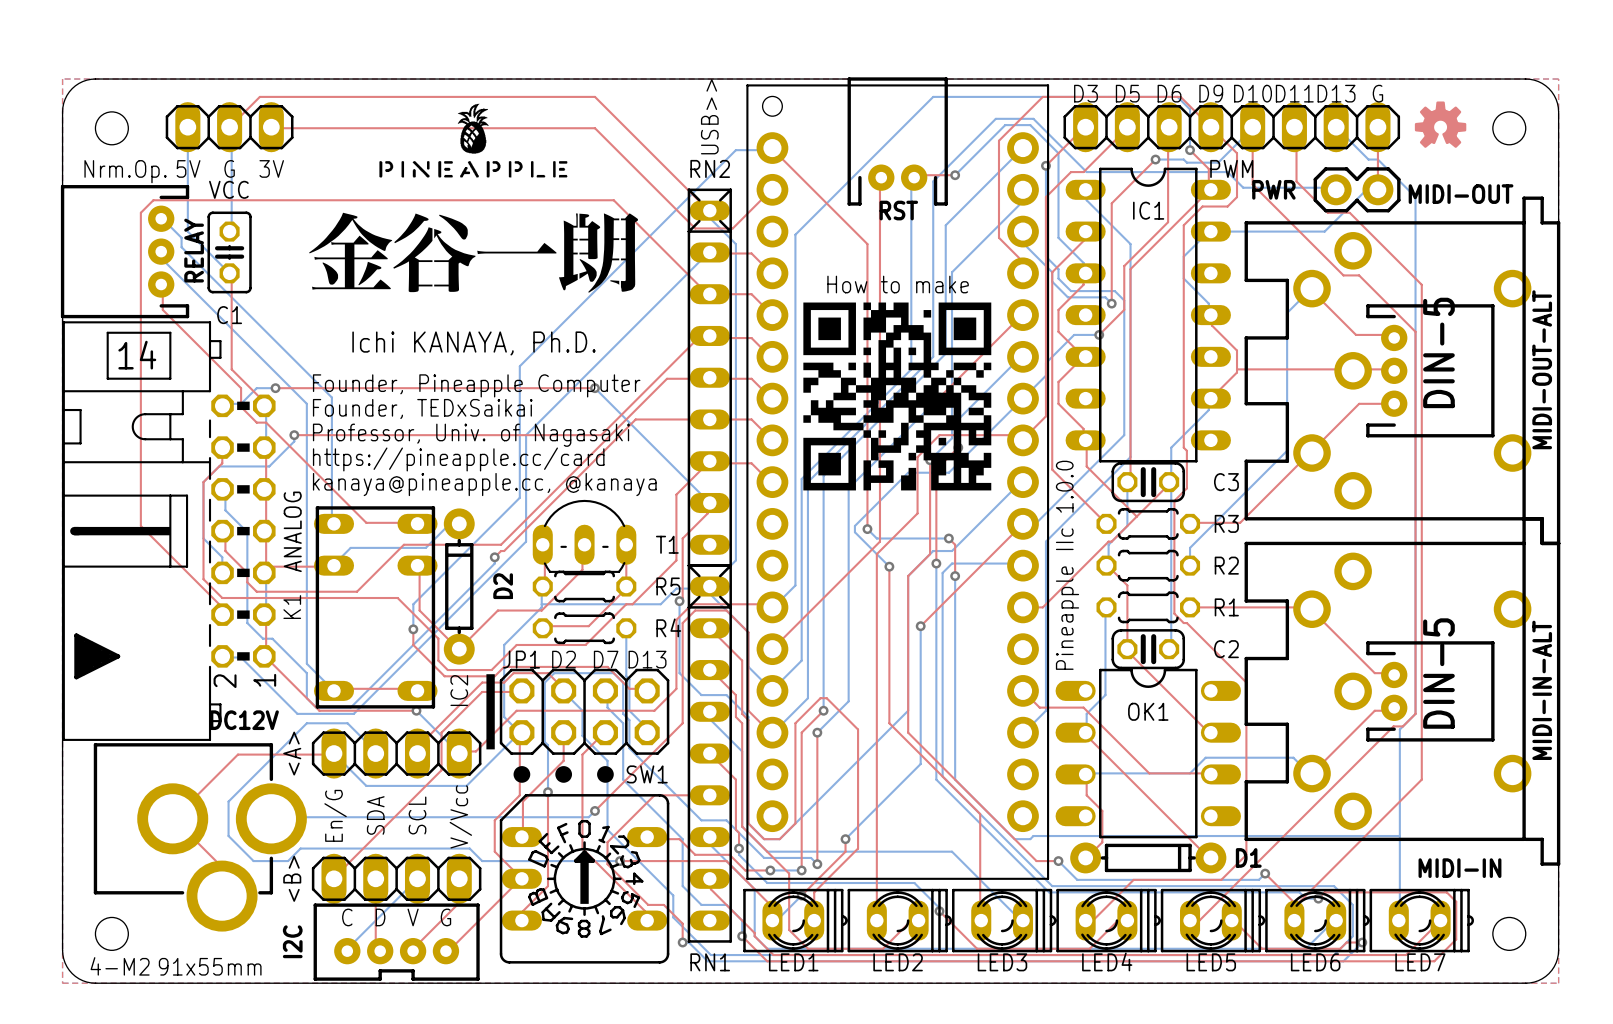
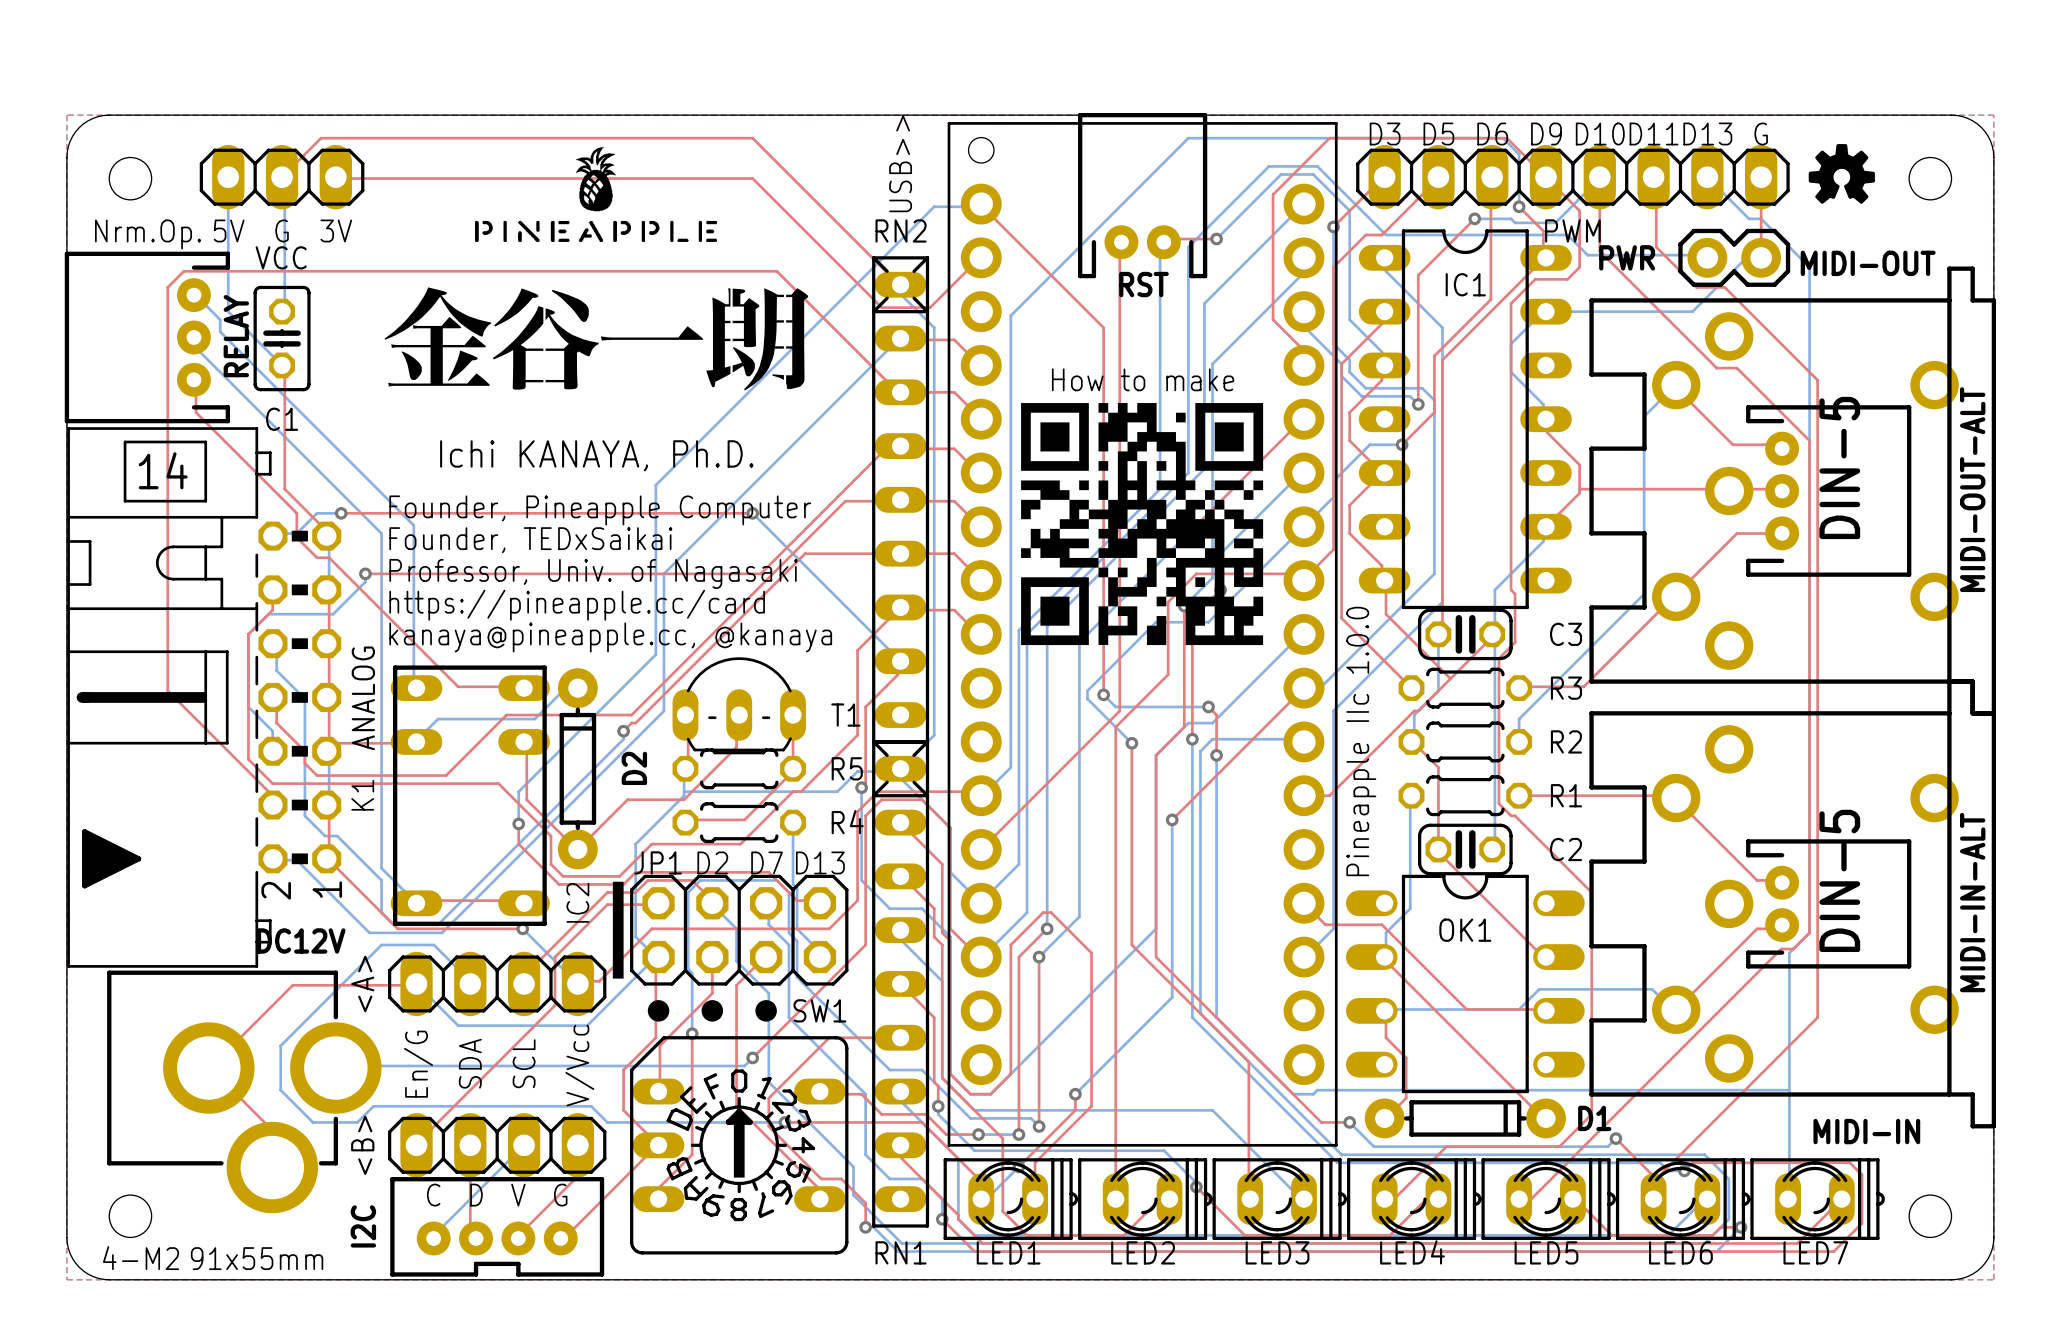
drawing shape: [1414, 101, 1467, 148] -> [1808, 144, 1875, 204]

